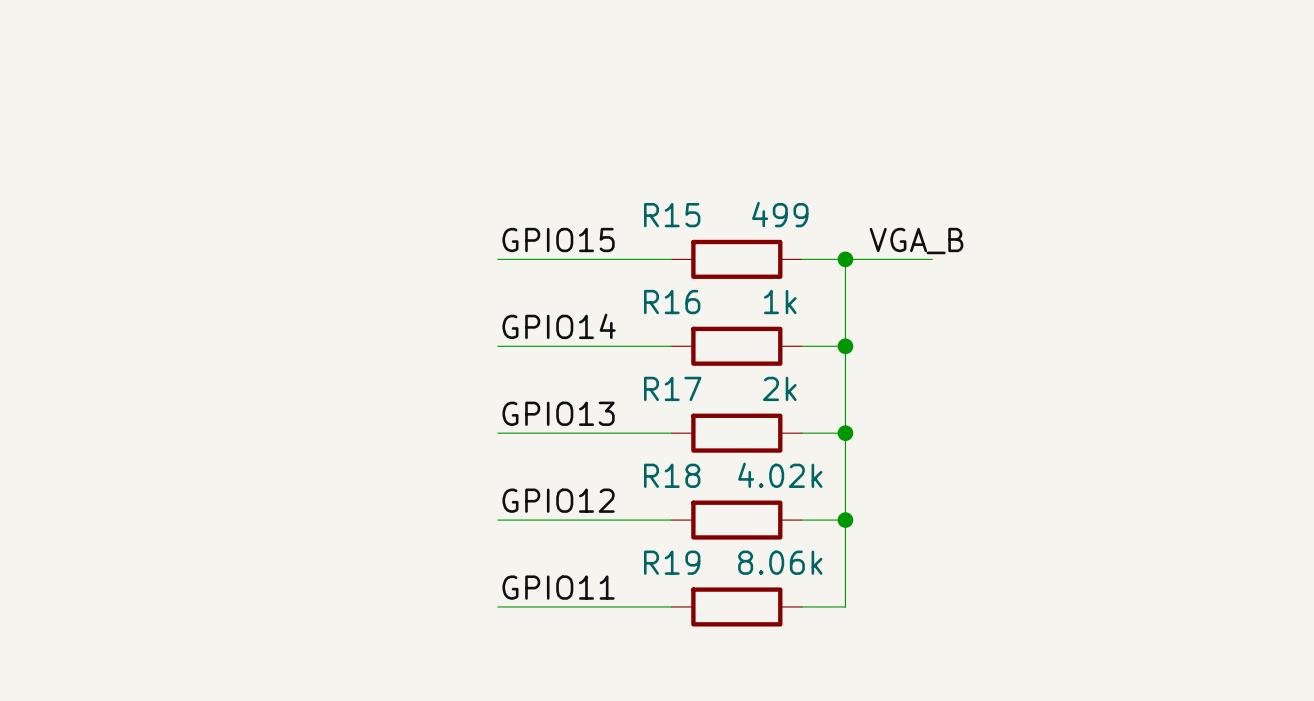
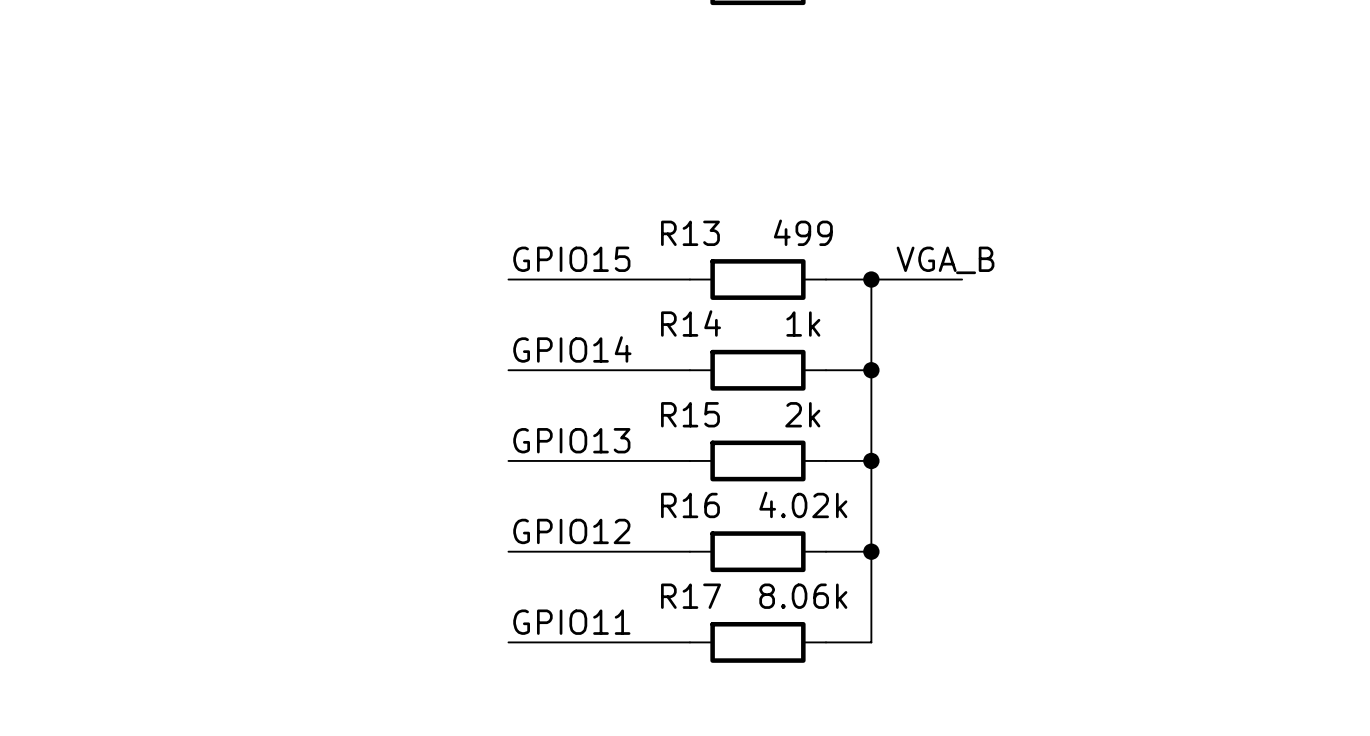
R15 name: R15 (672, 215) -> R13 (690, 233)
R16 name: R16 (672, 302) -> R14 (691, 323)
R17 name: R17 (672, 388) -> R15 (690, 414)
R18 name: R18 (672, 475) -> R16 (690, 505)
R19 name: R19 (672, 562) -> R17 (691, 596)

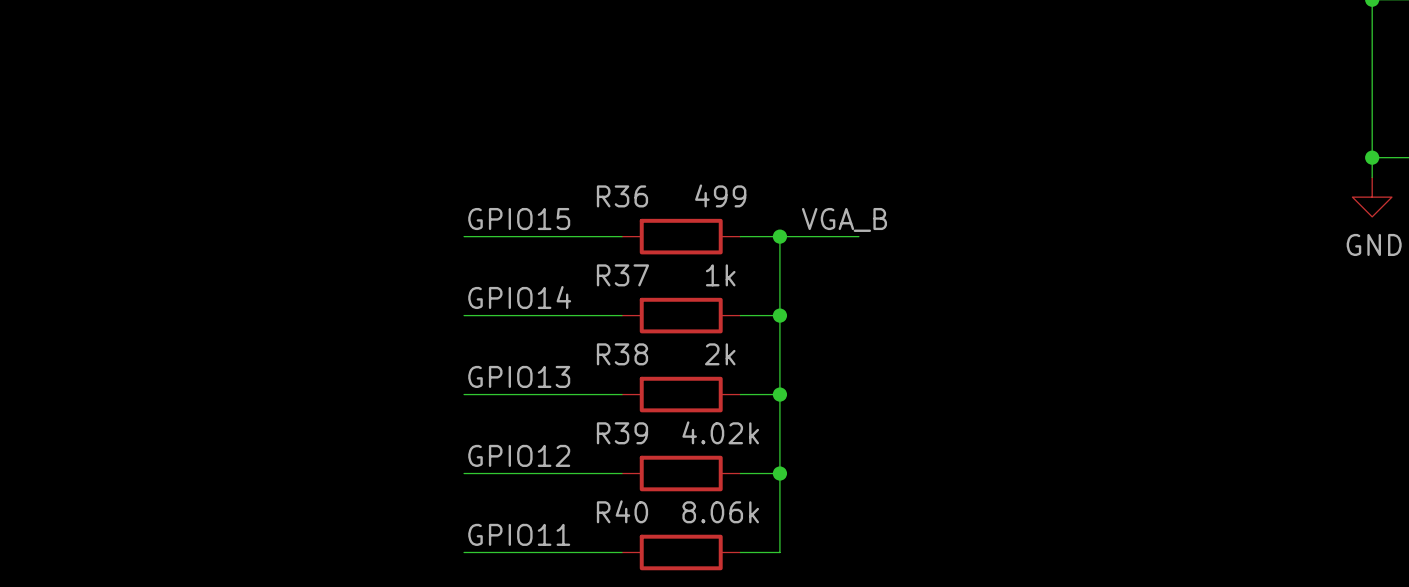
R13 name: R13 (690, 233) -> R36 (622, 196)
R14 name: R14 (691, 323) -> R37 (622, 275)
R15 name: R15 (690, 414) -> R38 (622, 354)
R16 name: R16 (690, 505) -> R39 (622, 433)
R17 name: R17 (691, 596) -> R40 (622, 511)

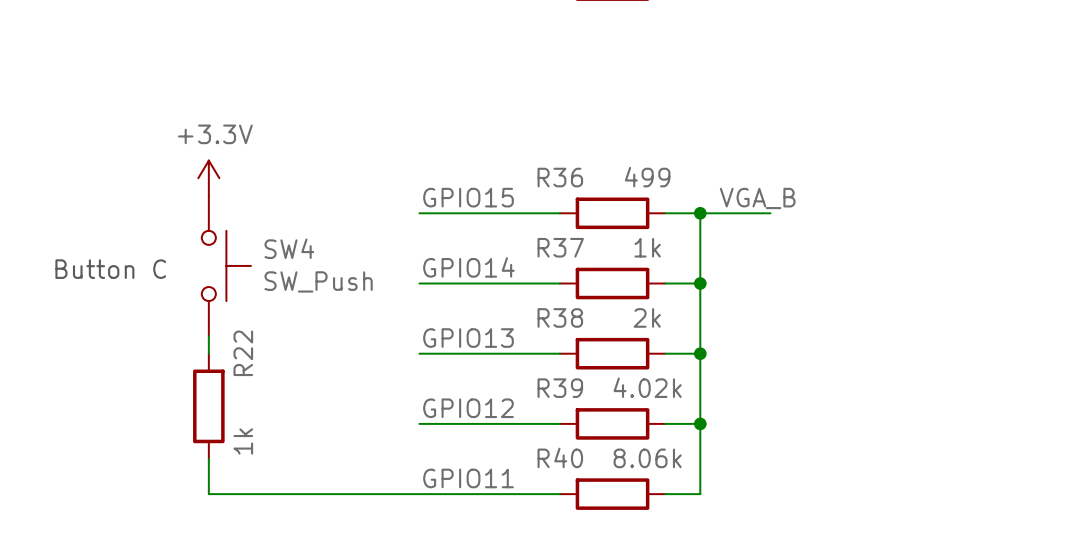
power symbol: none -> +3.3V (208, 178)
SW4: none -> SW_Push (226, 265)
text: none -> Button C (110, 269)
wire: none -> (208, 336) (208, 353)
R22: none -> 1k (208, 406)
wire: none -> (208, 459) (208, 494) (419, 494)

